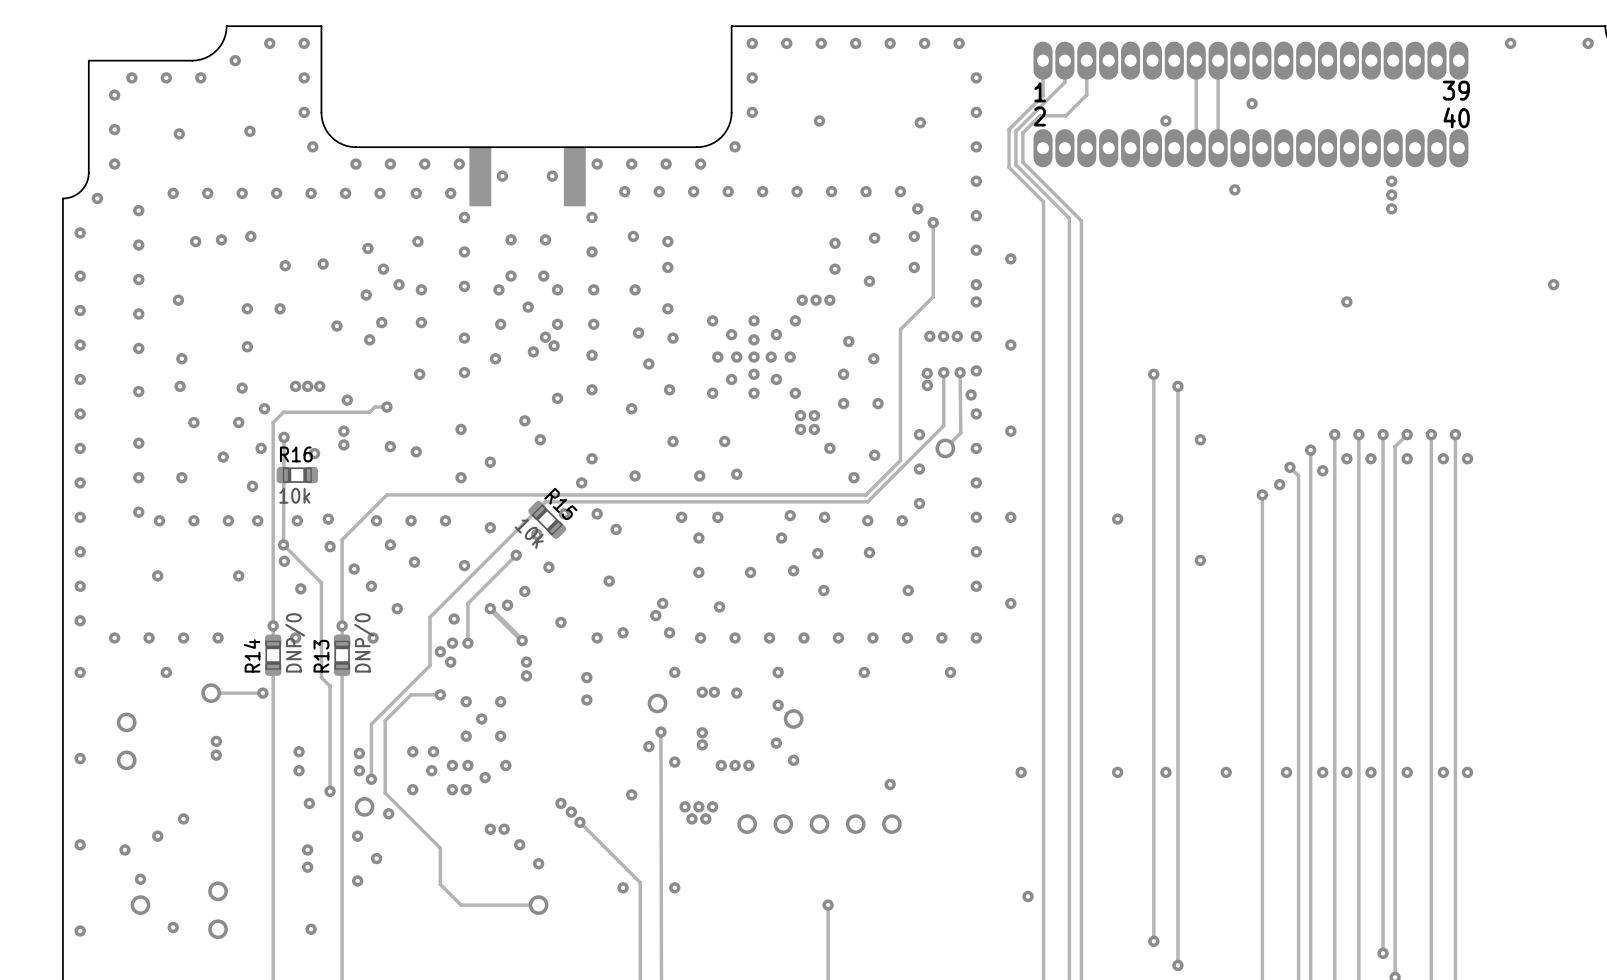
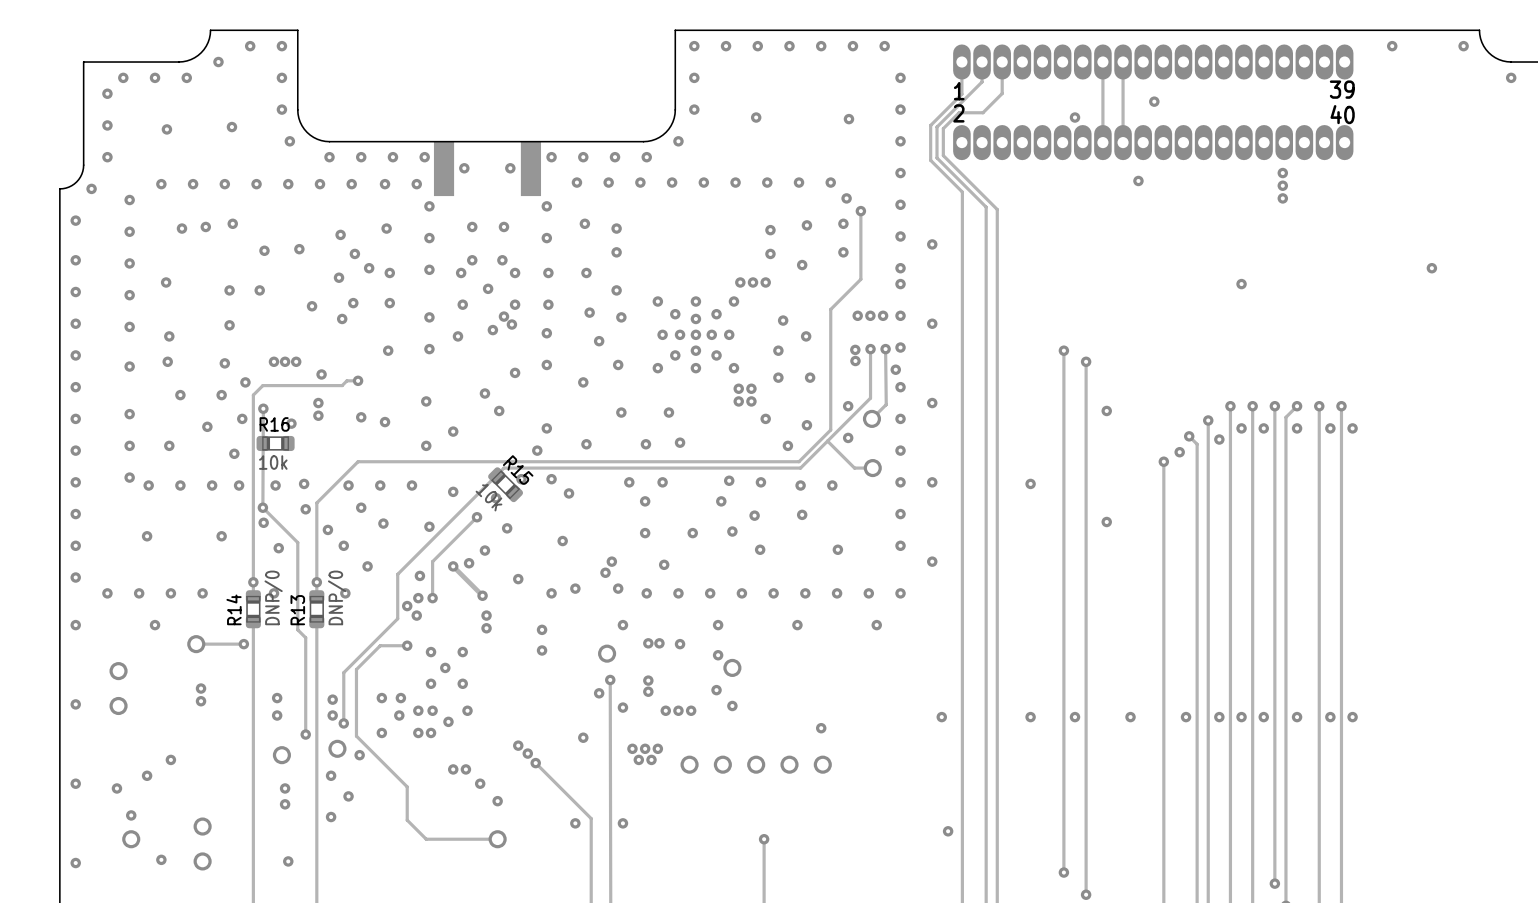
track: none -> (827, 441) (854, 468) (872, 468)
part: none -> (872, 468)
via: (919, 503) -> none
via: (309, 803) -> none
part: none -> (281, 755)

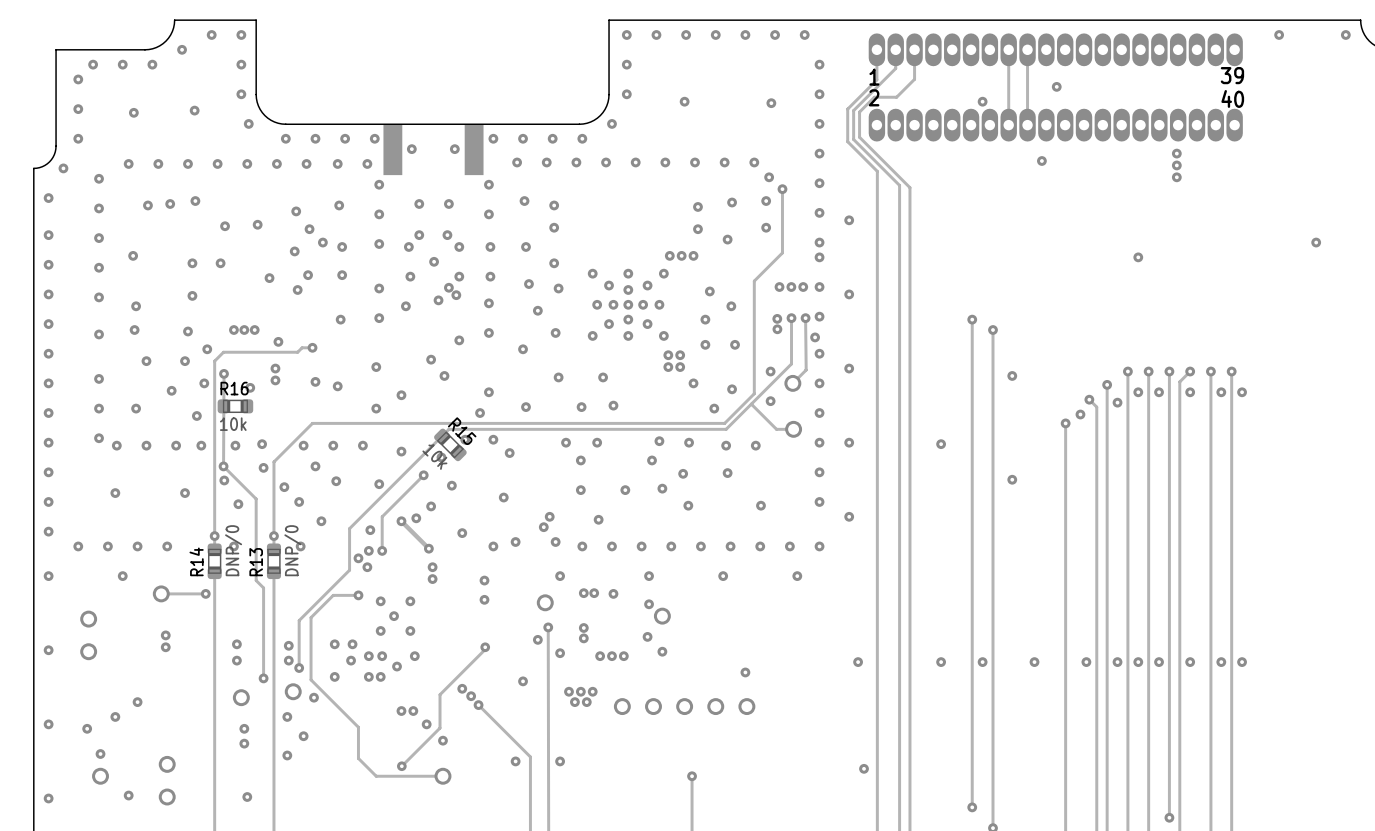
track: none -> (485, 647) (485, 649) (440, 694) (440, 728) (401, 766)
via: none -> (485, 647)
via: none -> (401, 766)

